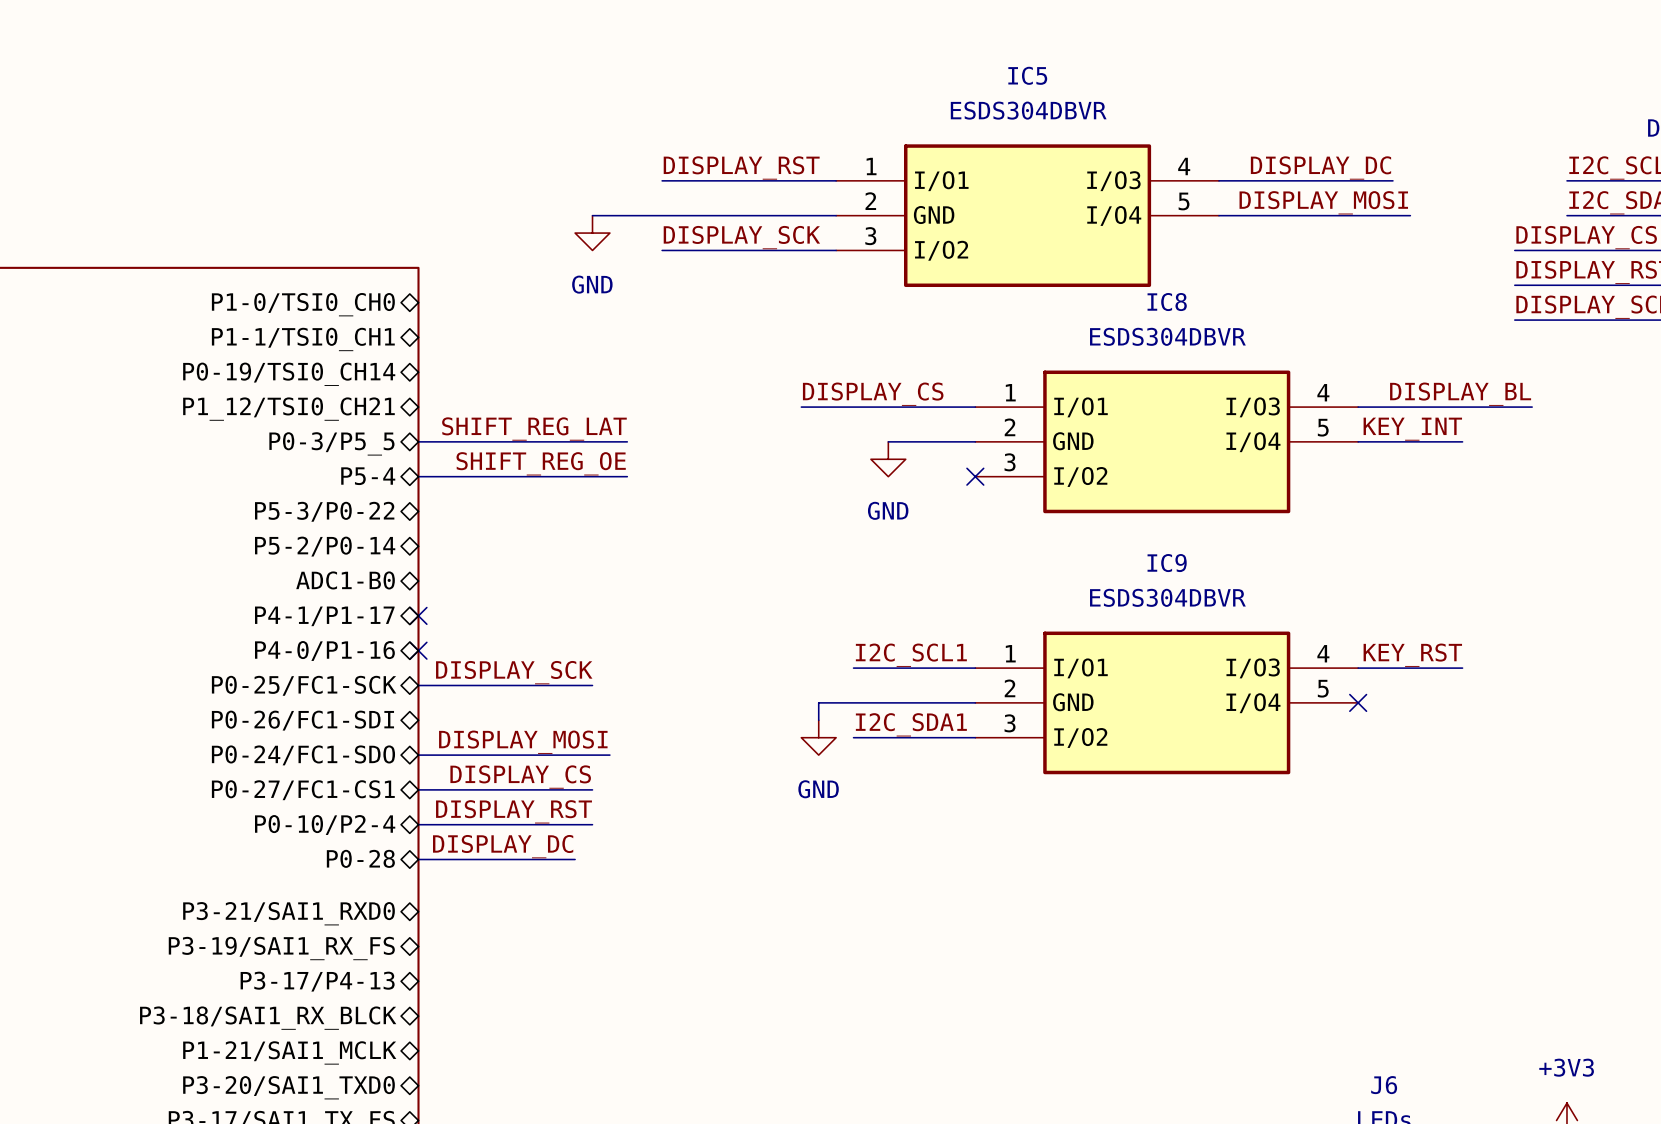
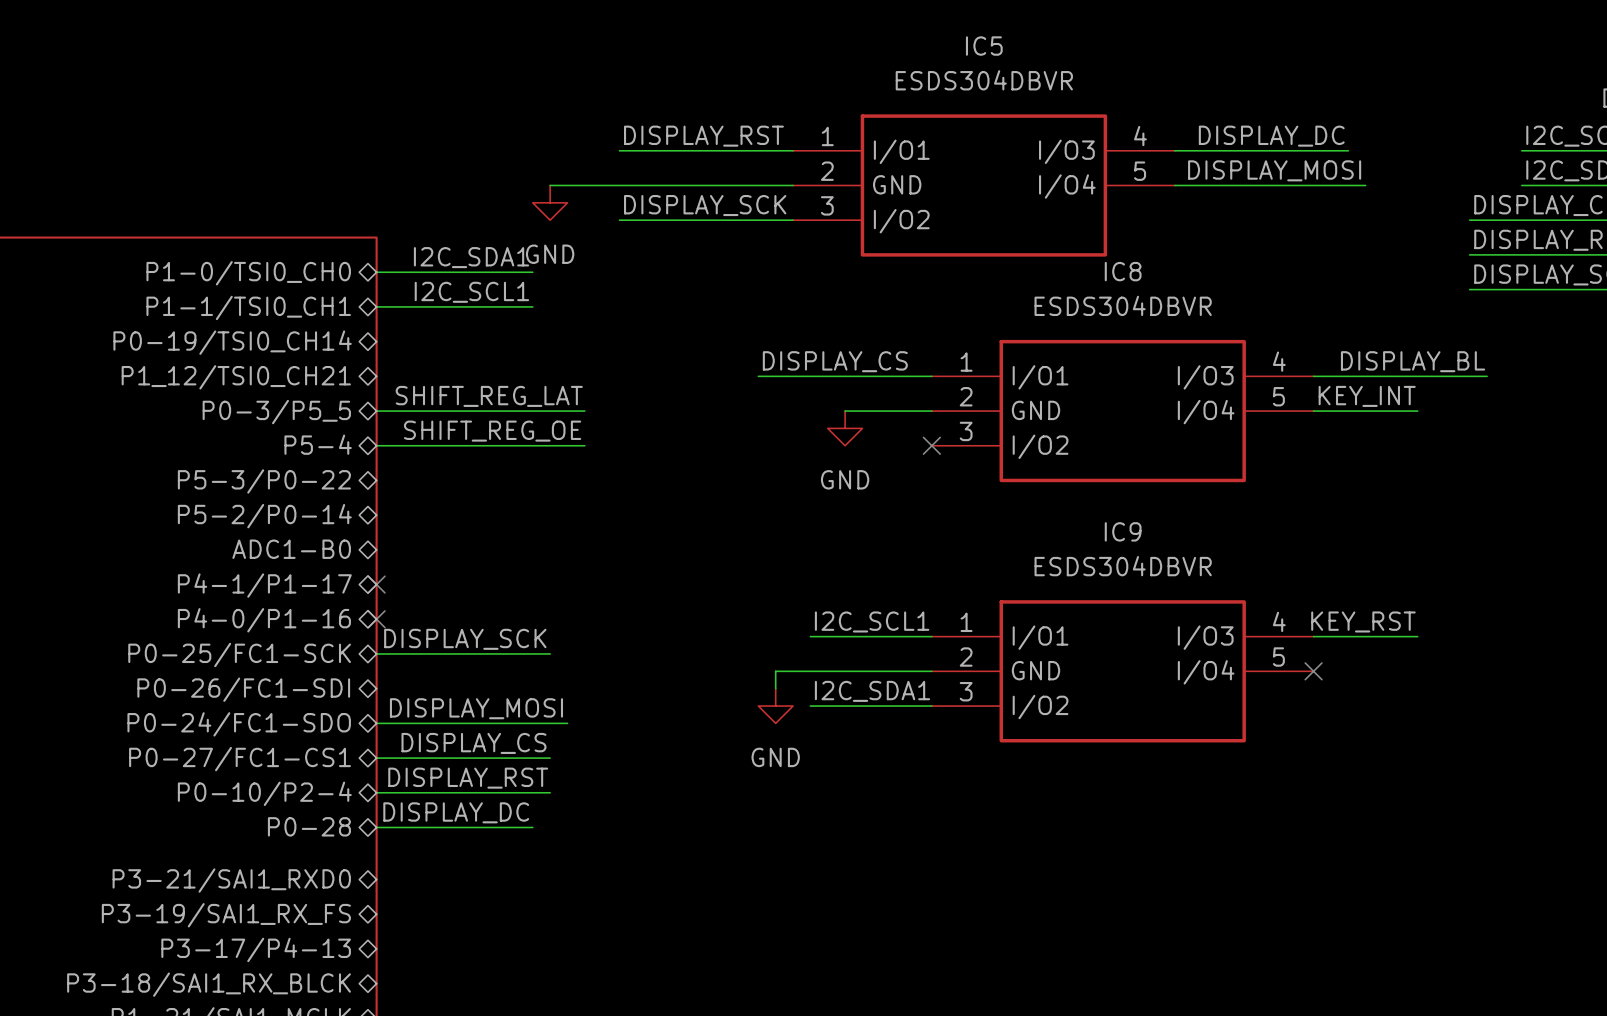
label: none -> I2C_SDA1 (471, 257)
wire: none -> (376, 272) (532, 272)
label: none -> I2C_SCL1 (471, 292)
wire: none -> (376, 306) (532, 306)

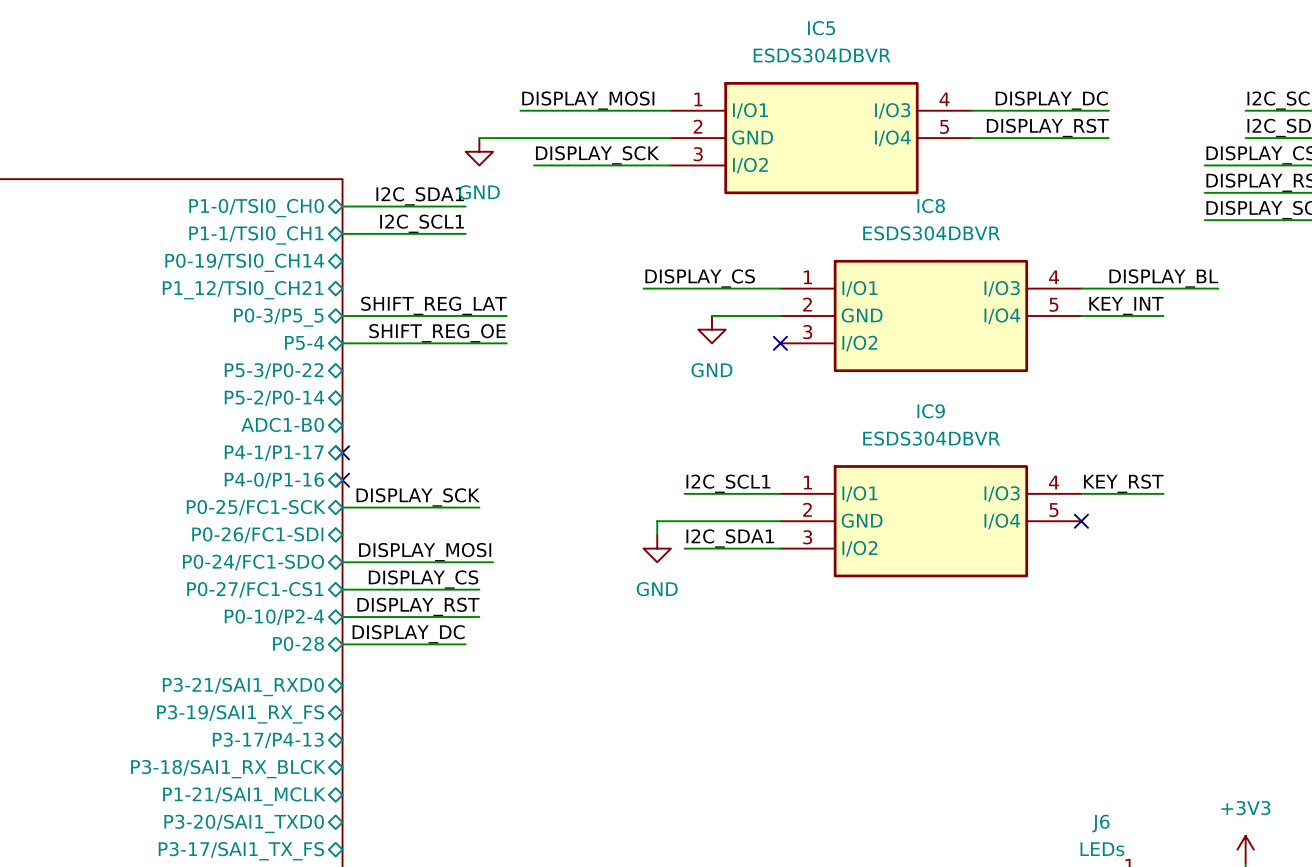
label: DISPLAY_RST (703, 136) -> DISPLAY_MOSI (588, 100)
wire: none -> (520, 110) (534, 110)
label: DISPLAY_MOSI (1274, 170) -> DISPLAY_RST (1047, 127)
wire: (1348, 185) (1365, 185) -> none

